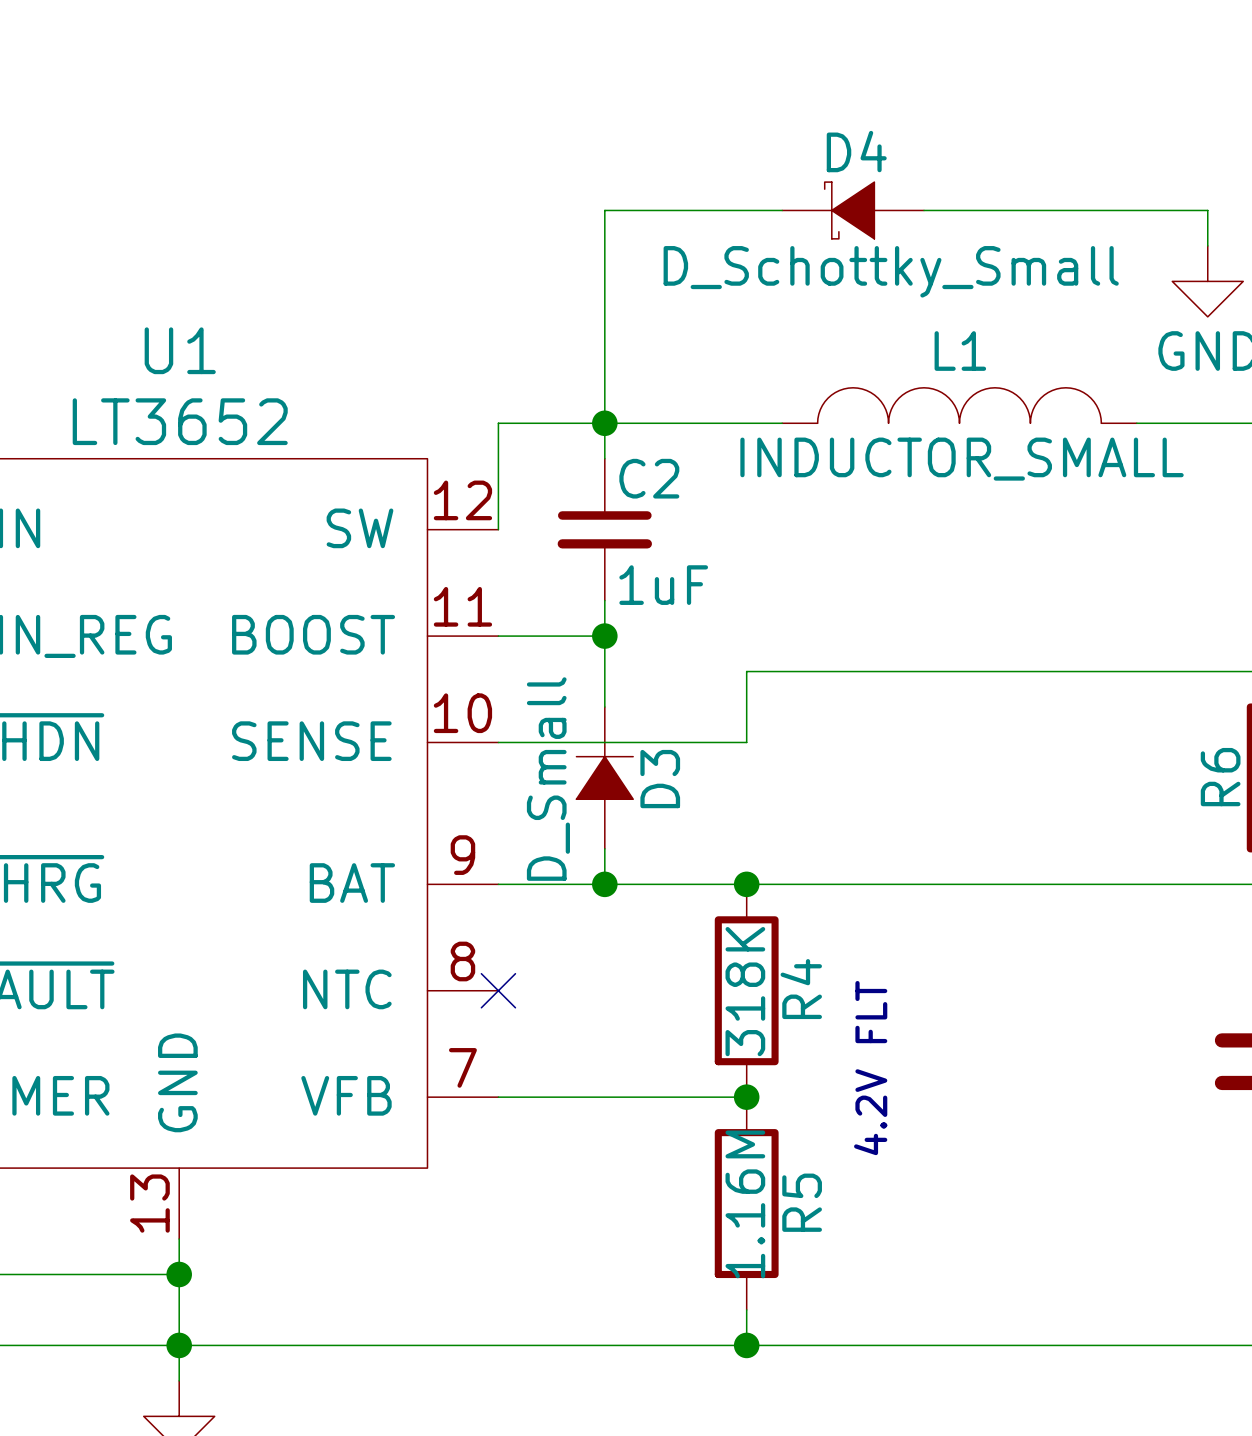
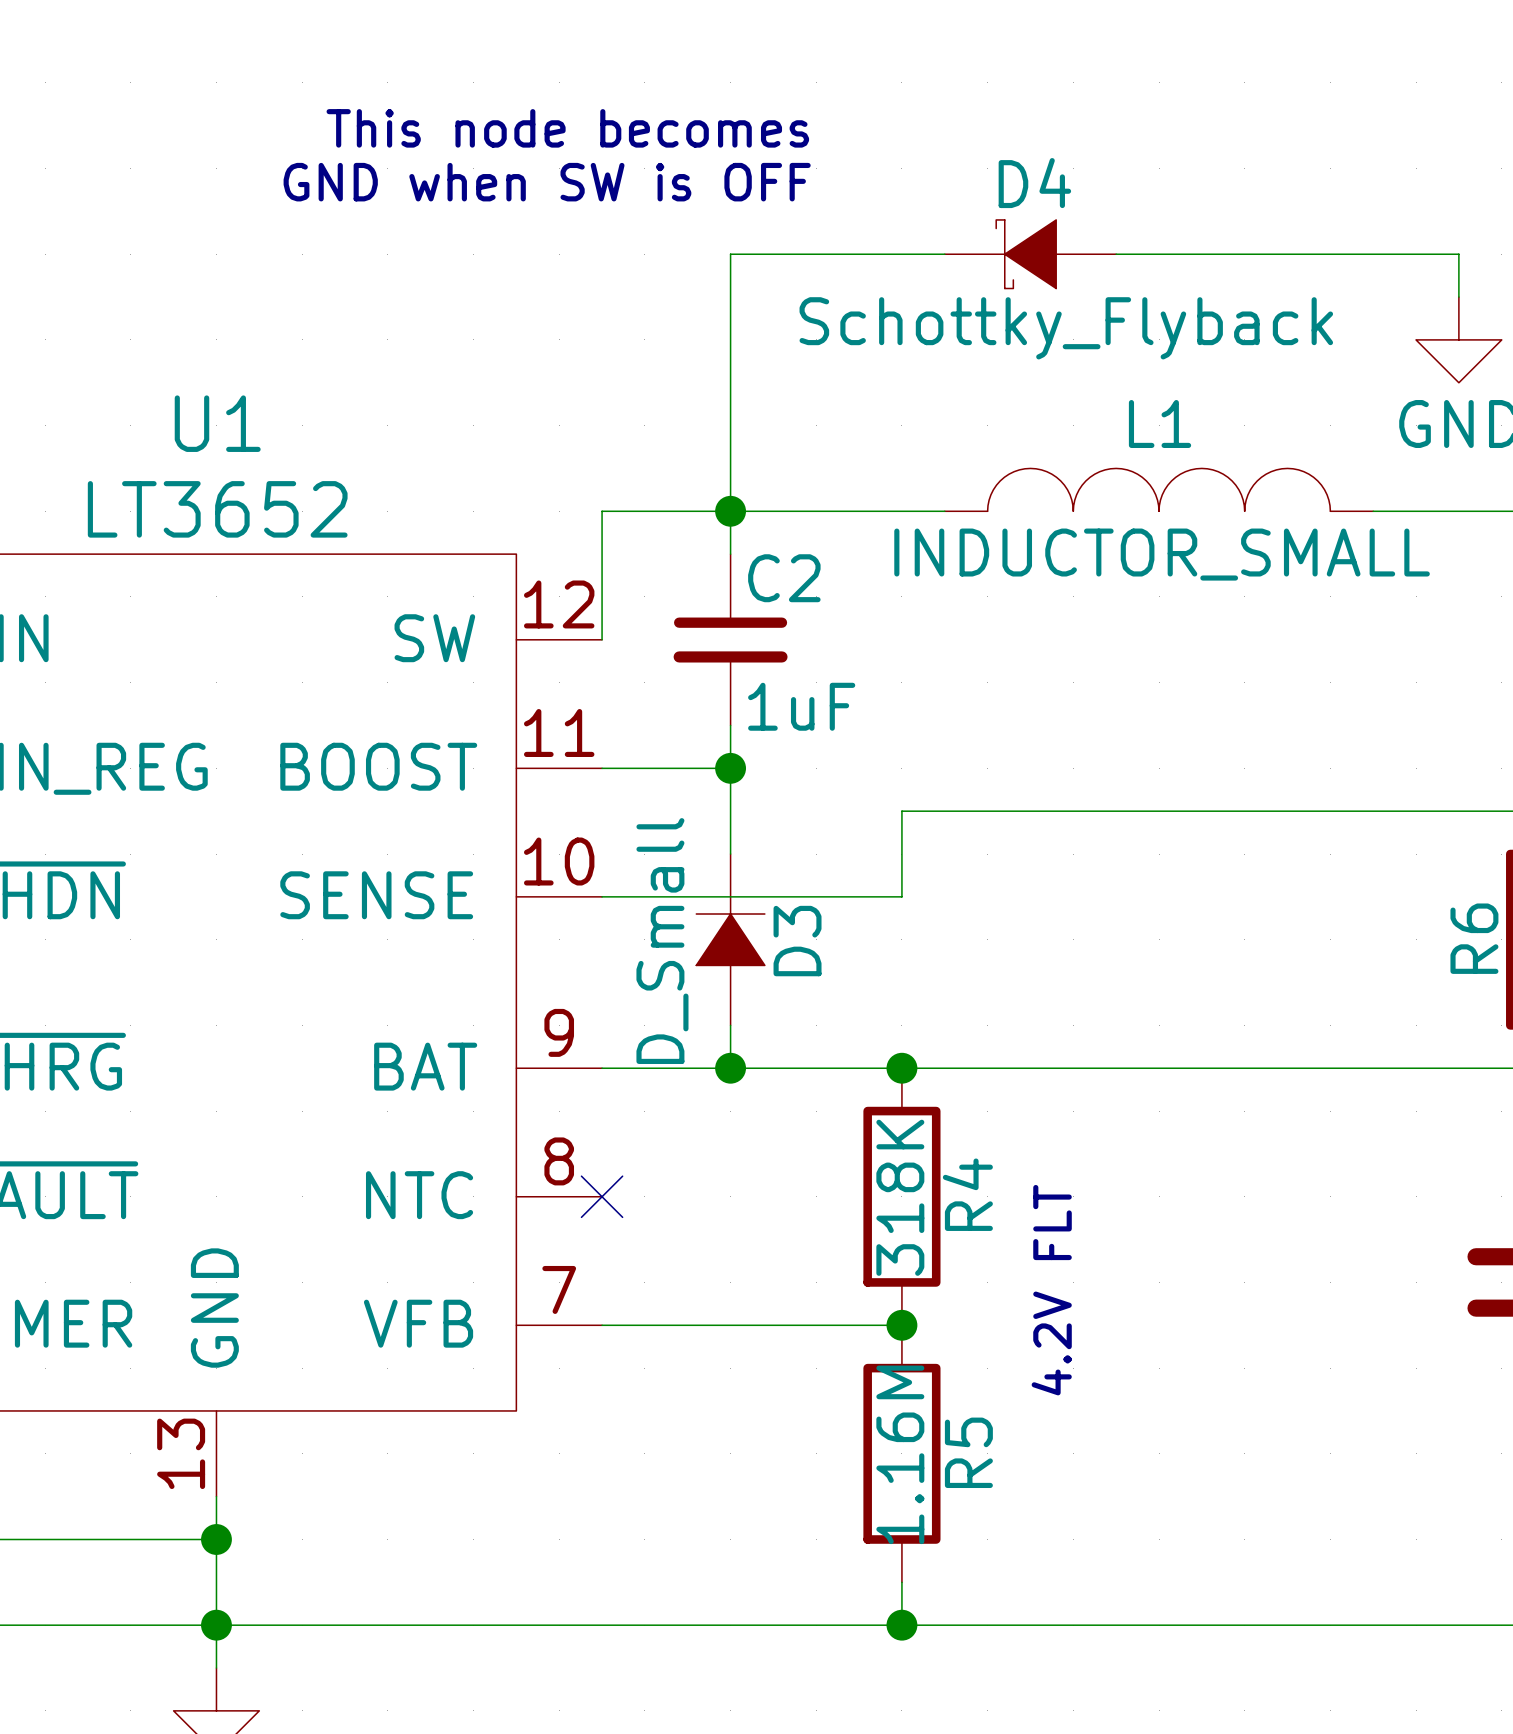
text: none -> This node becomes (567, 128)
text: none -> GND when SW is OFF (547, 182)
D4 value: D_Schottky_Small (891, 271) -> Schottky_Flyback (1066, 328)

